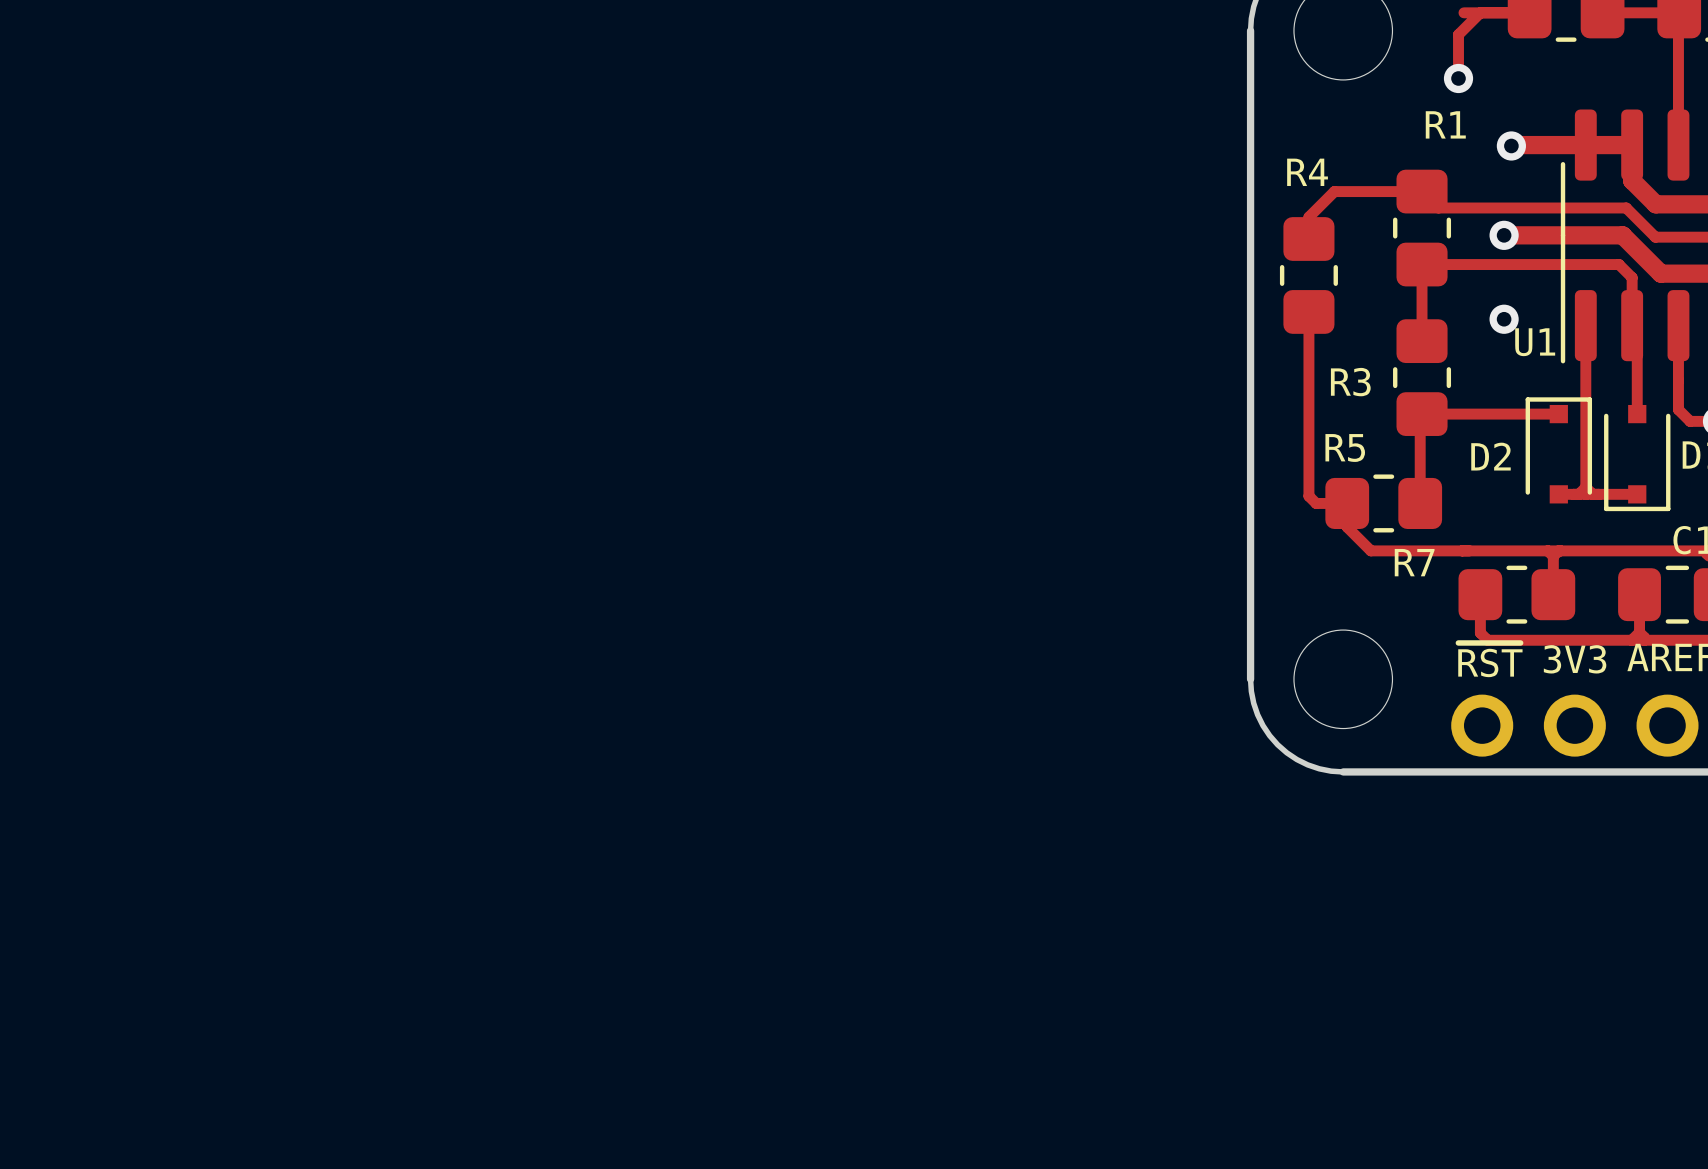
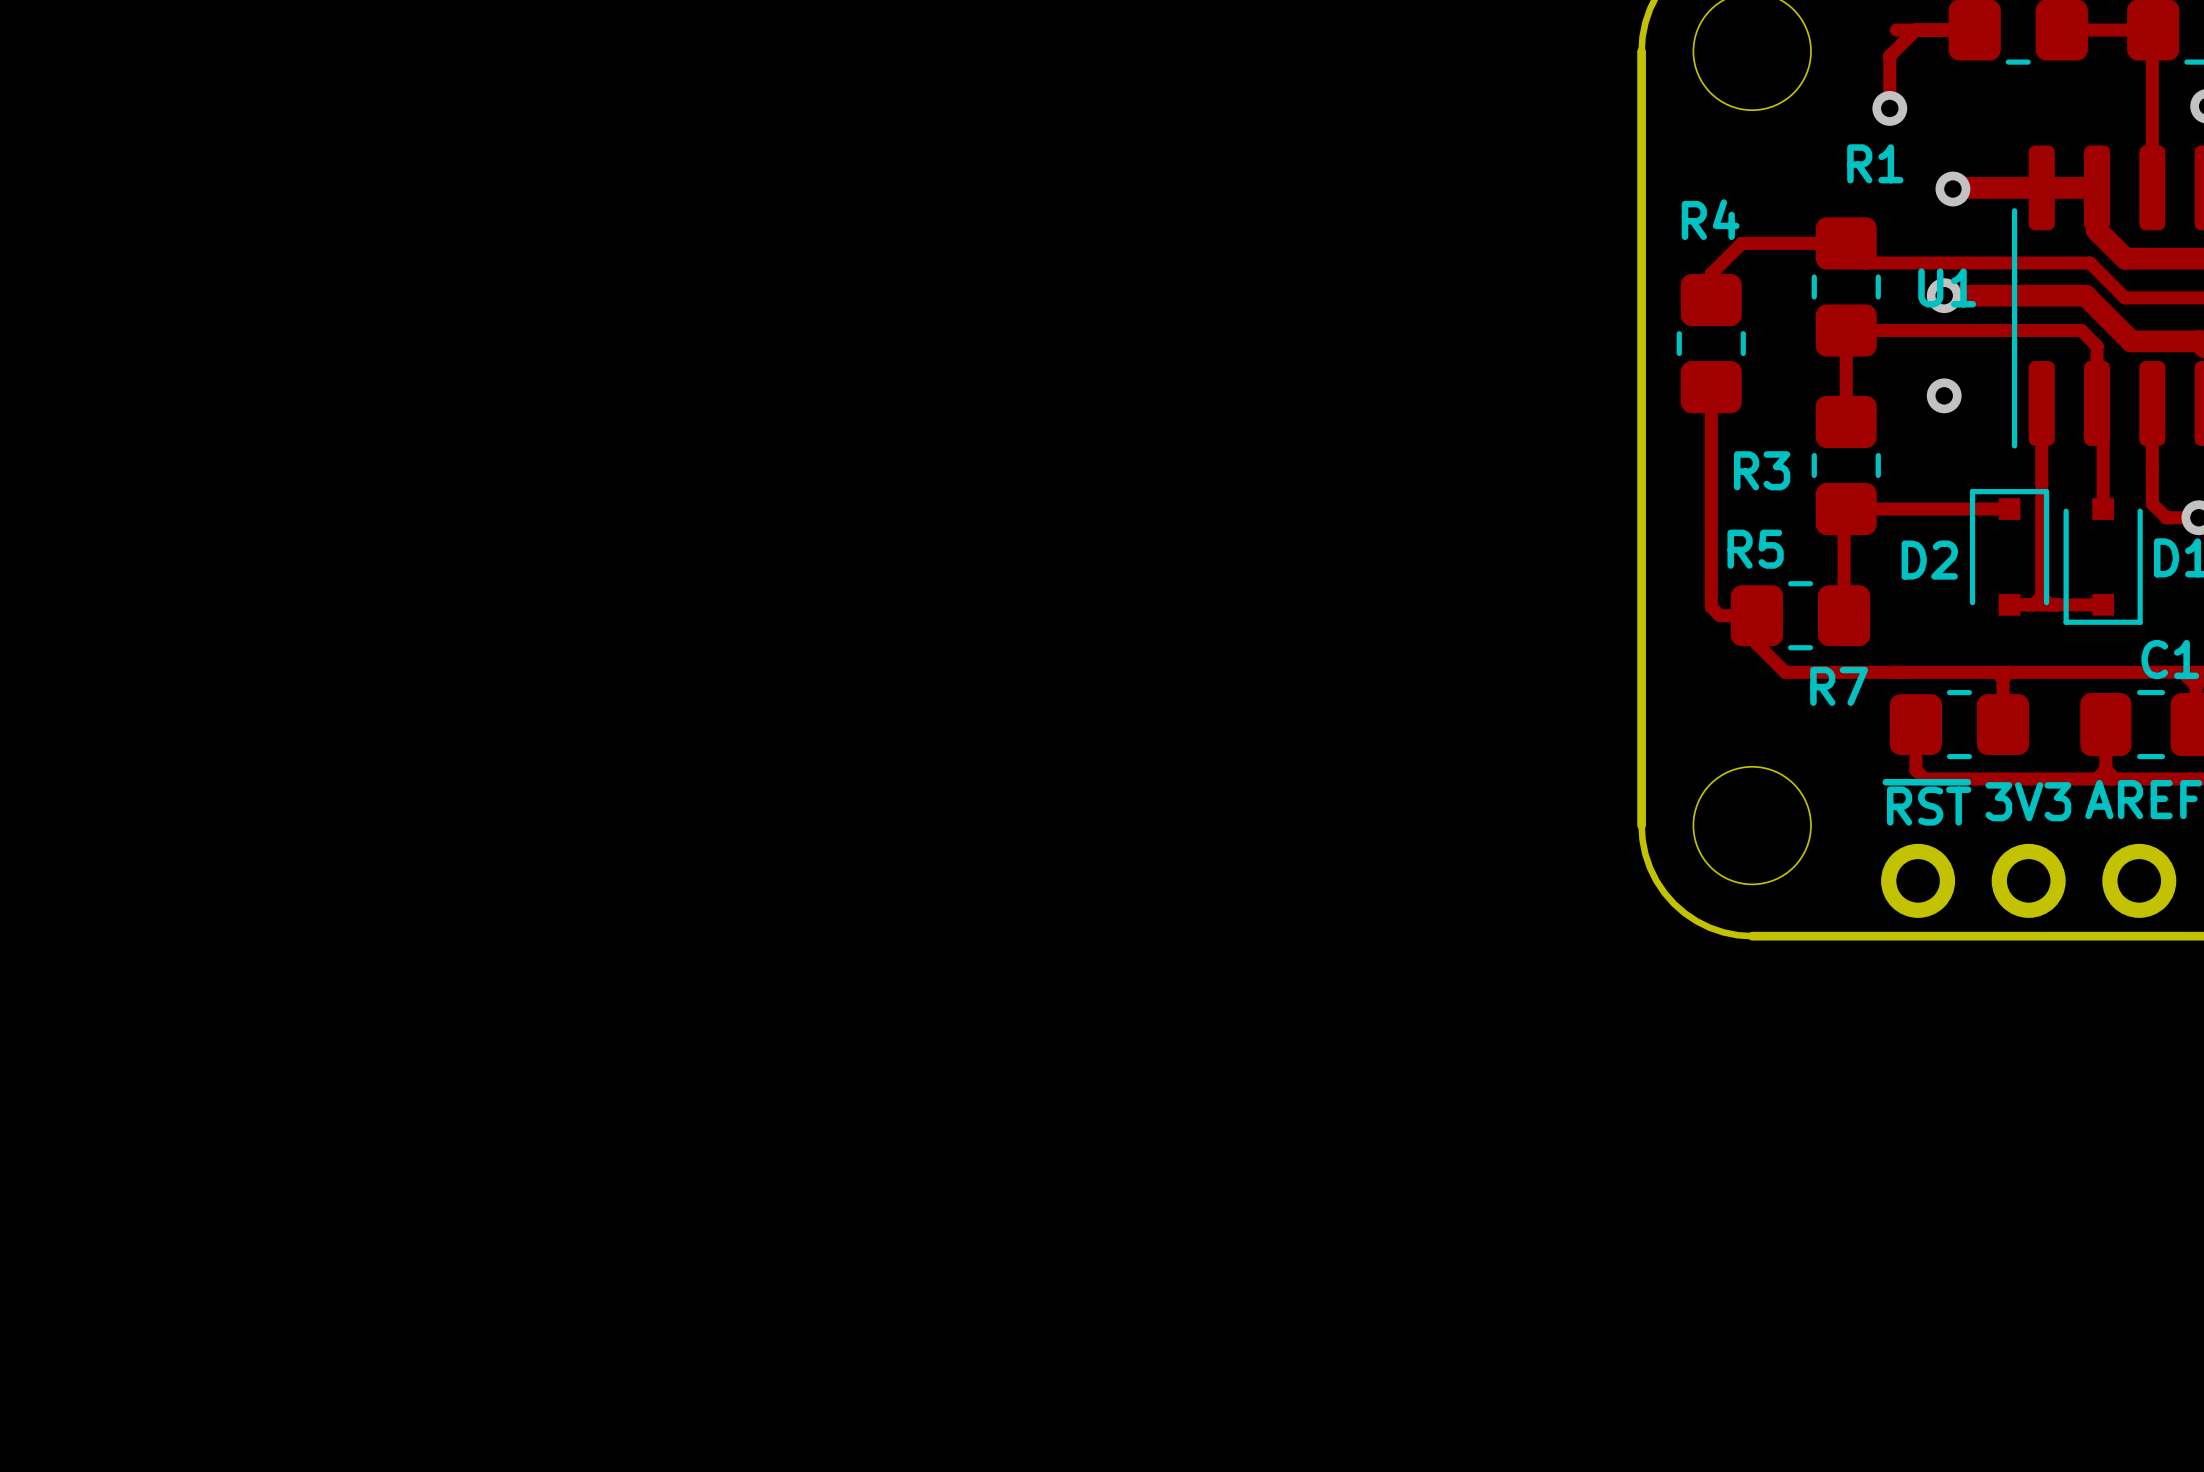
U1 name position: U1 (1535, 342) -> U1 (1947, 287)

